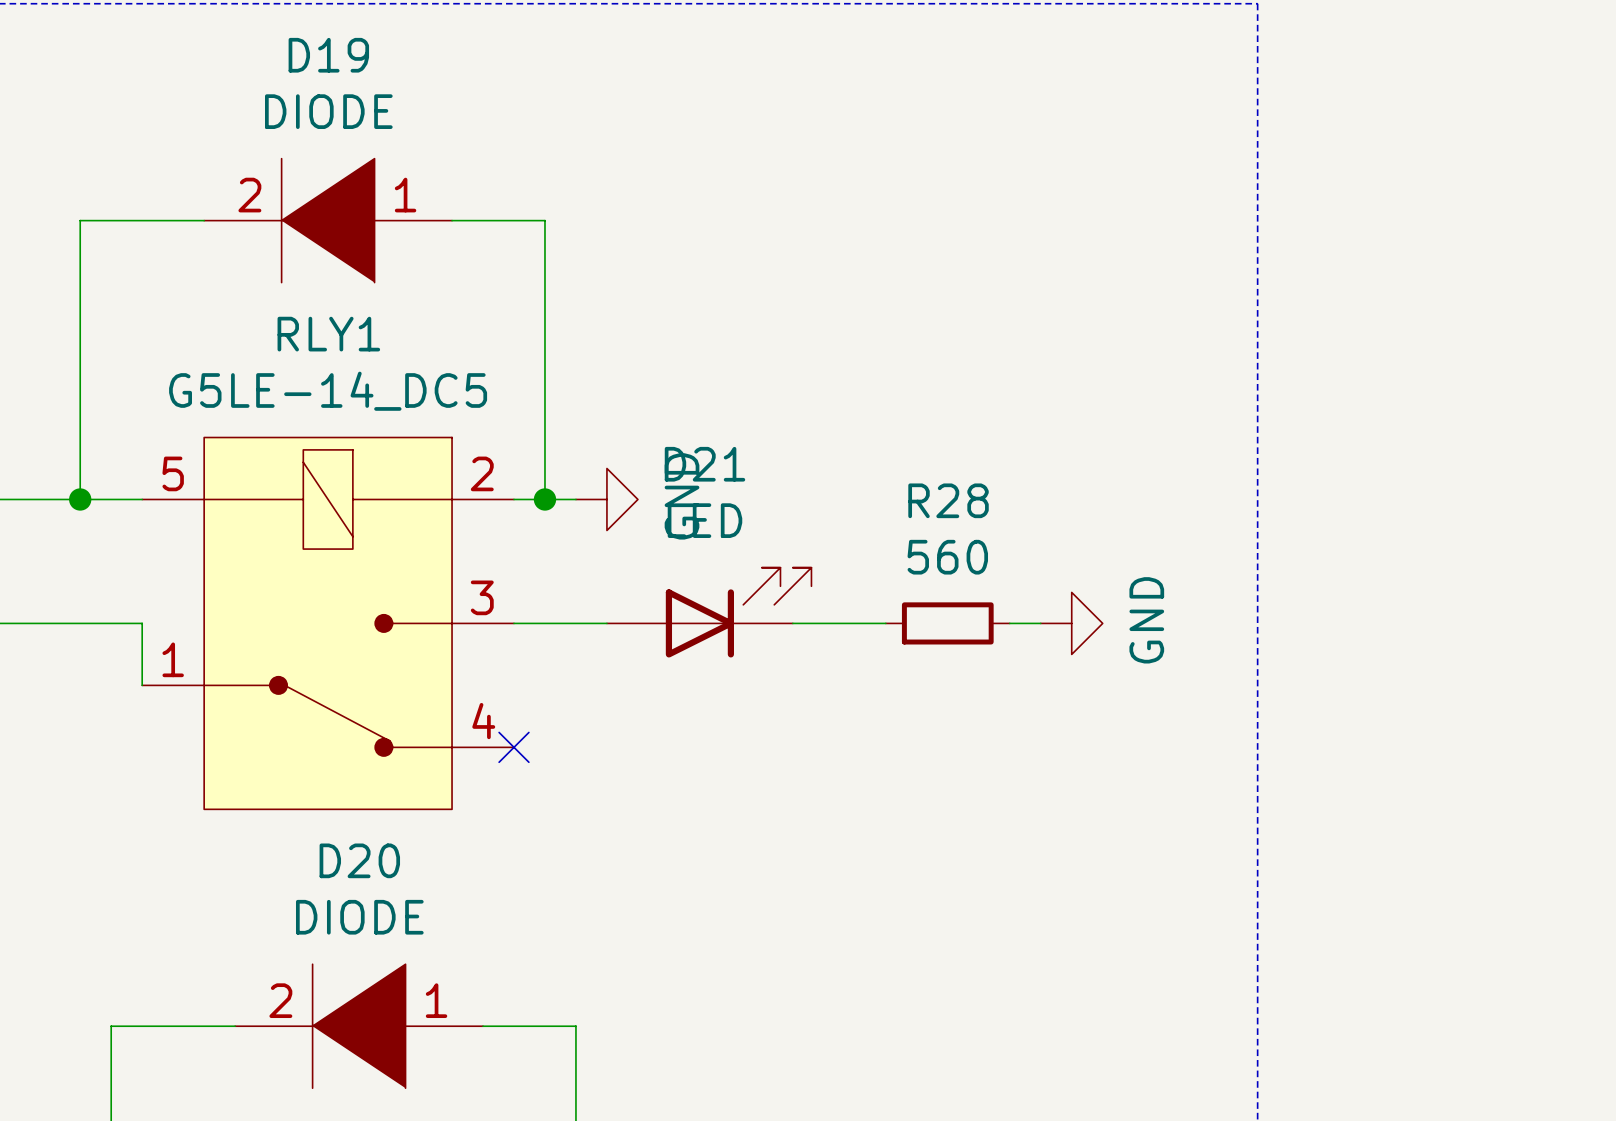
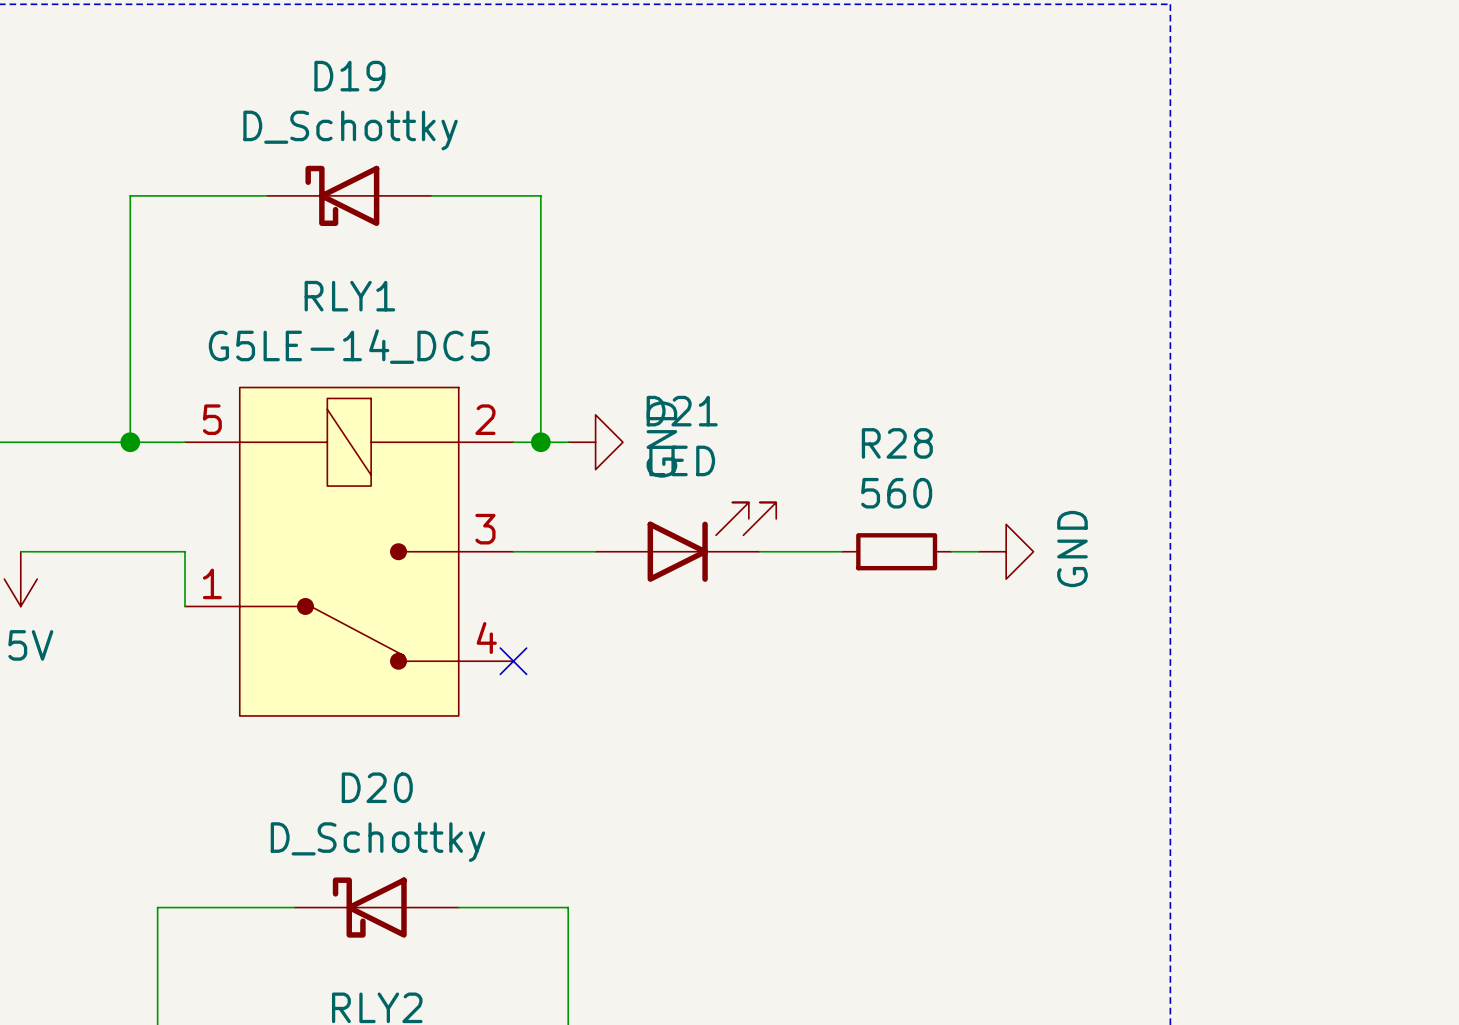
D19 value: DIODE (328, 111) -> D_Schottky (350, 130)
D19 symbol: [204, 158, 453, 283] -> [267, 165, 432, 227]
D20 value: DIODE (359, 917) -> D_Schottky (377, 842)
D20 symbol: [235, 964, 484, 1089] -> [294, 877, 459, 938]

